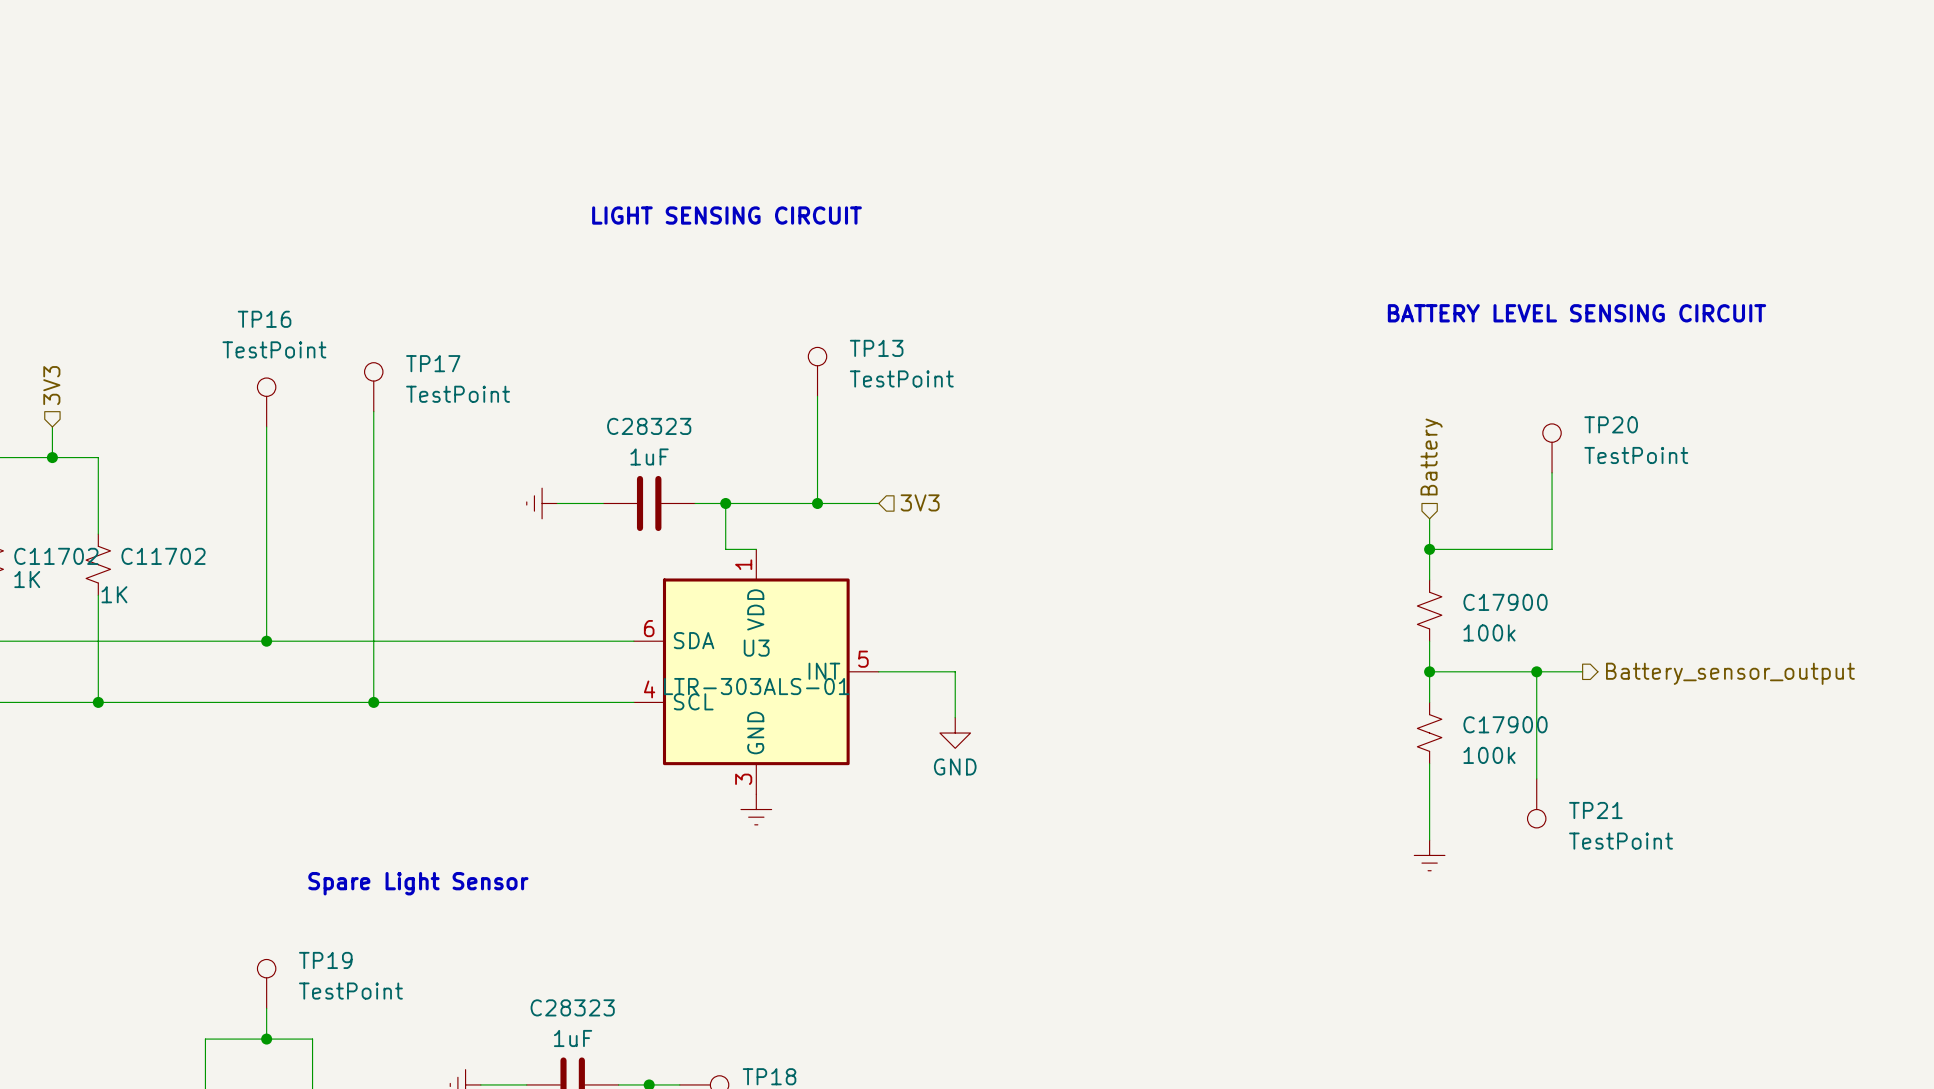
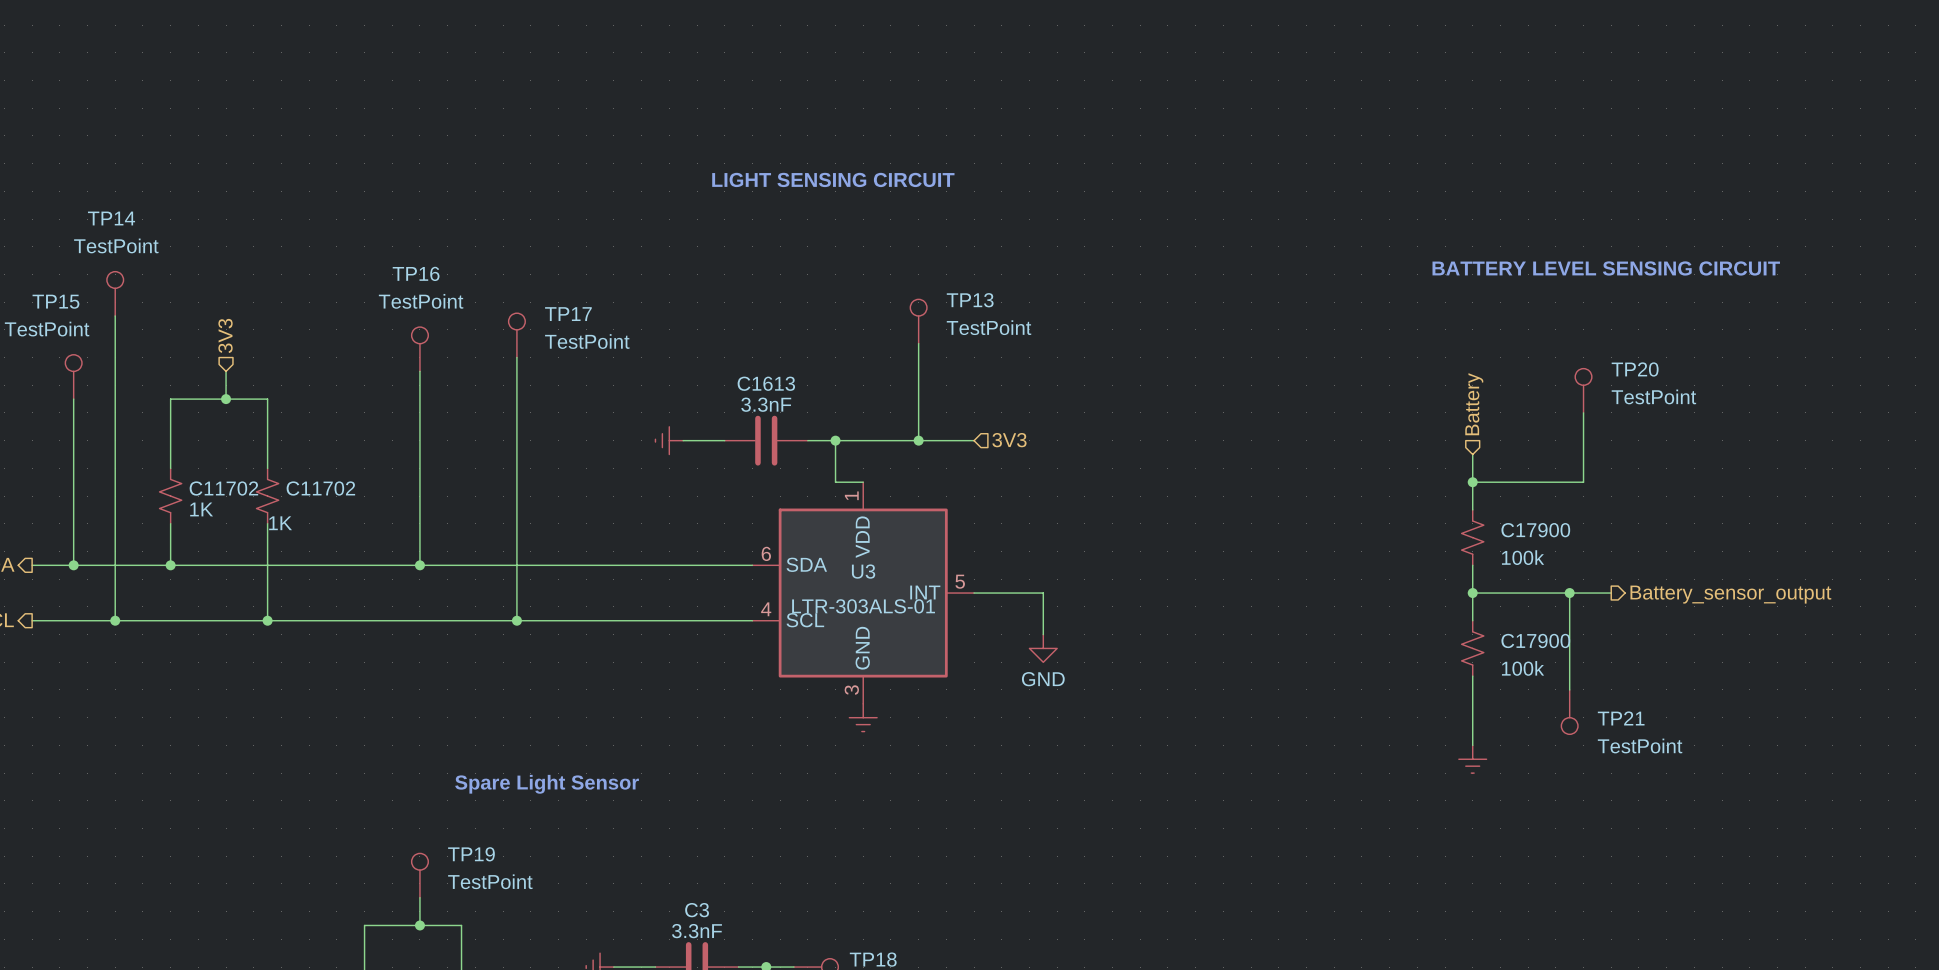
C28323 name: C28323 (649, 426) -> C1613 (766, 383)
C28323 value: 1uF (649, 457) -> 3.3nF (766, 404)
C28323 name: C28323 (572, 1007) -> C3 (697, 910)
C28323 value: 1uF (573, 1038) -> 3.3nF (696, 931)

